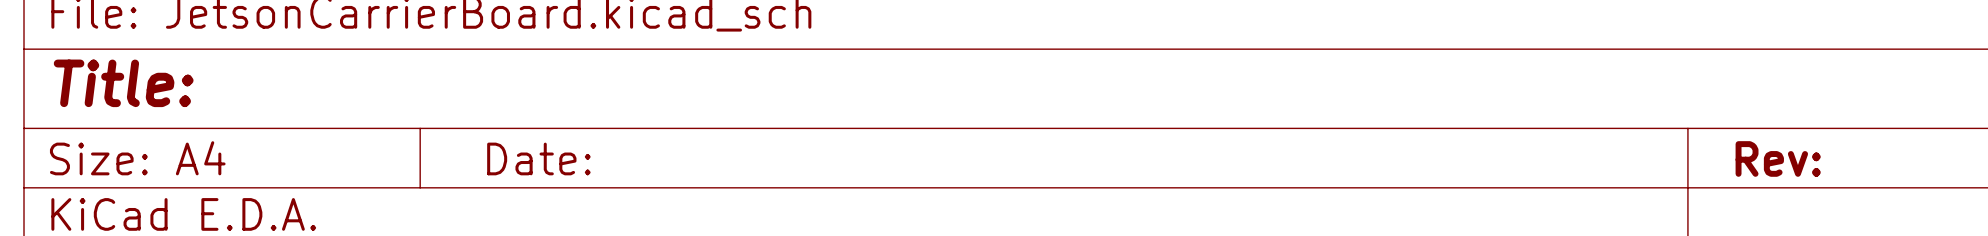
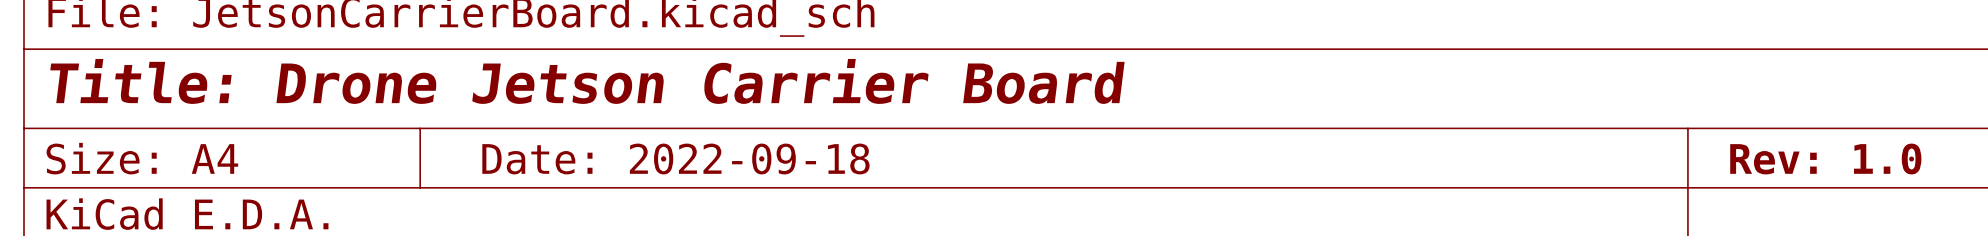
title block: Title: (123, 83) -> Title: Drone Jetson Carrier Board (587, 81)
title block: Date: (538, 158) -> Date: 2022-09-18 (675, 159)
title block: Rev: (1778, 158) -> Rev: 1.0 (1825, 159)

